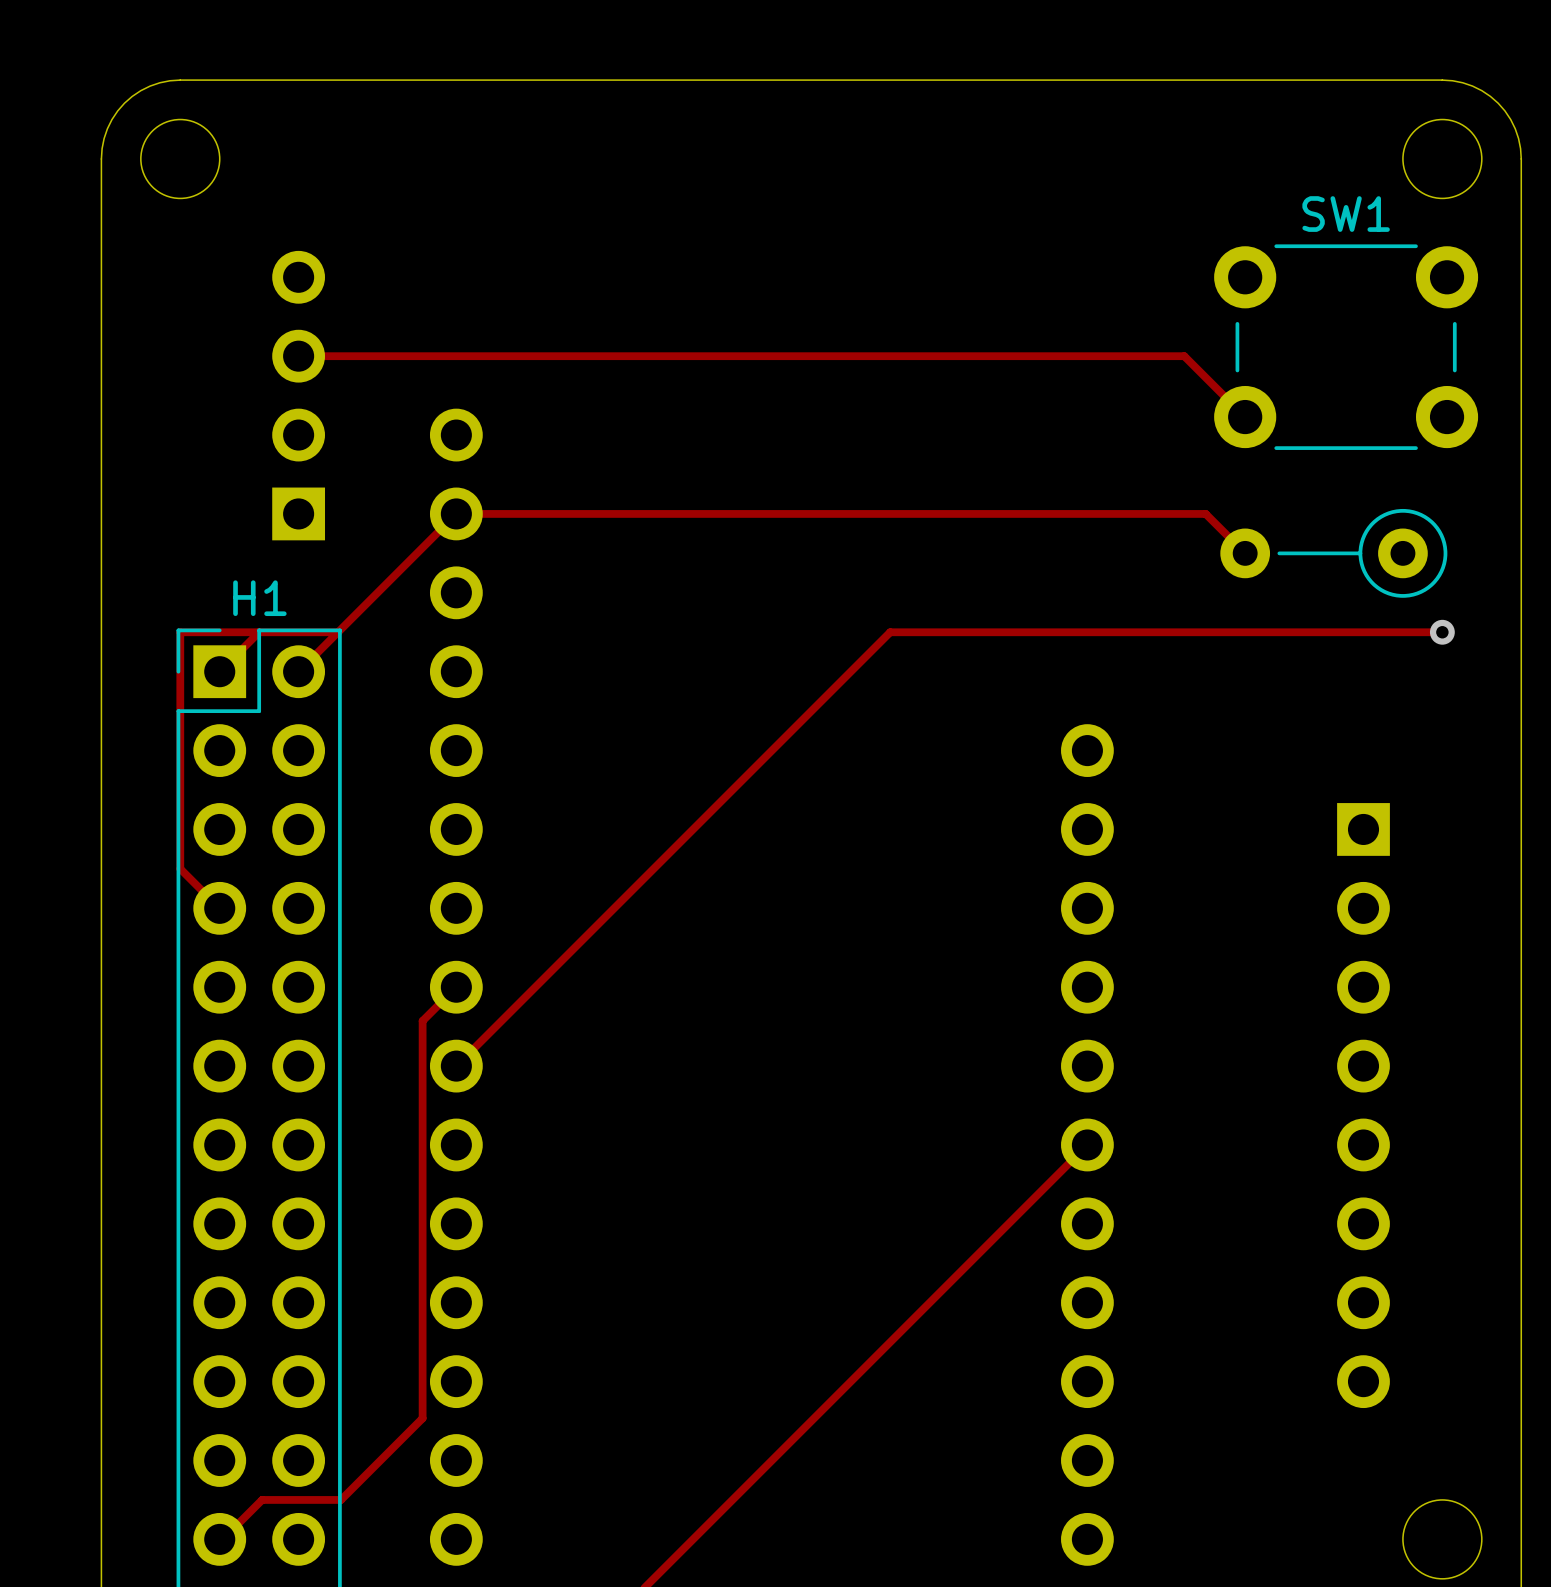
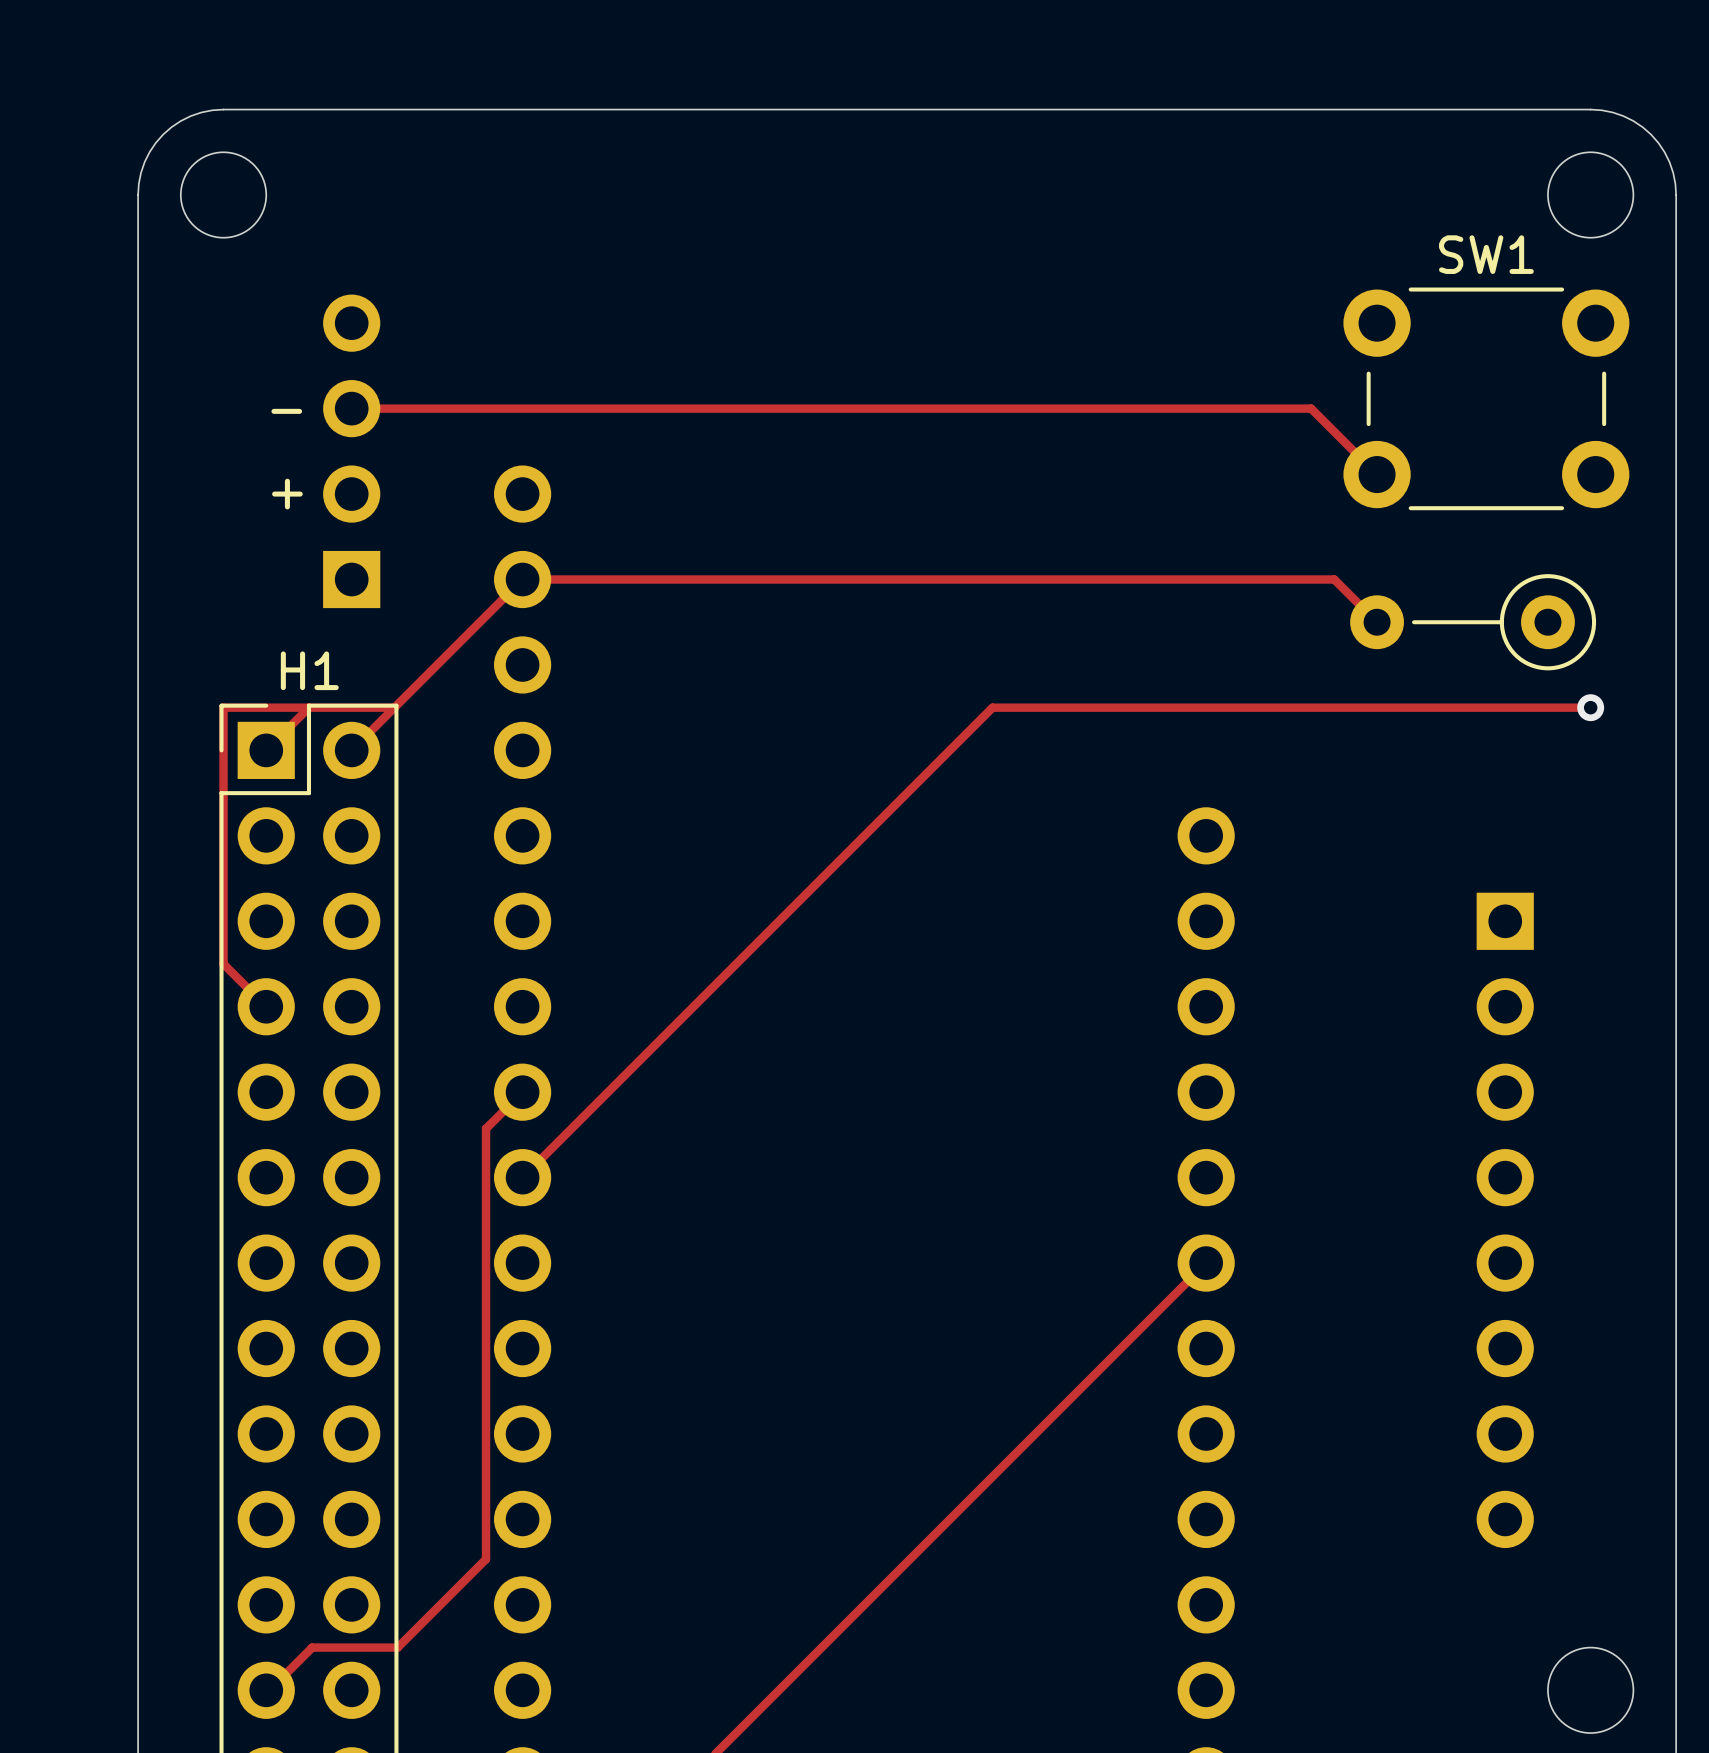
text: none -> - (286, 411)
text: none -> + (287, 494)

